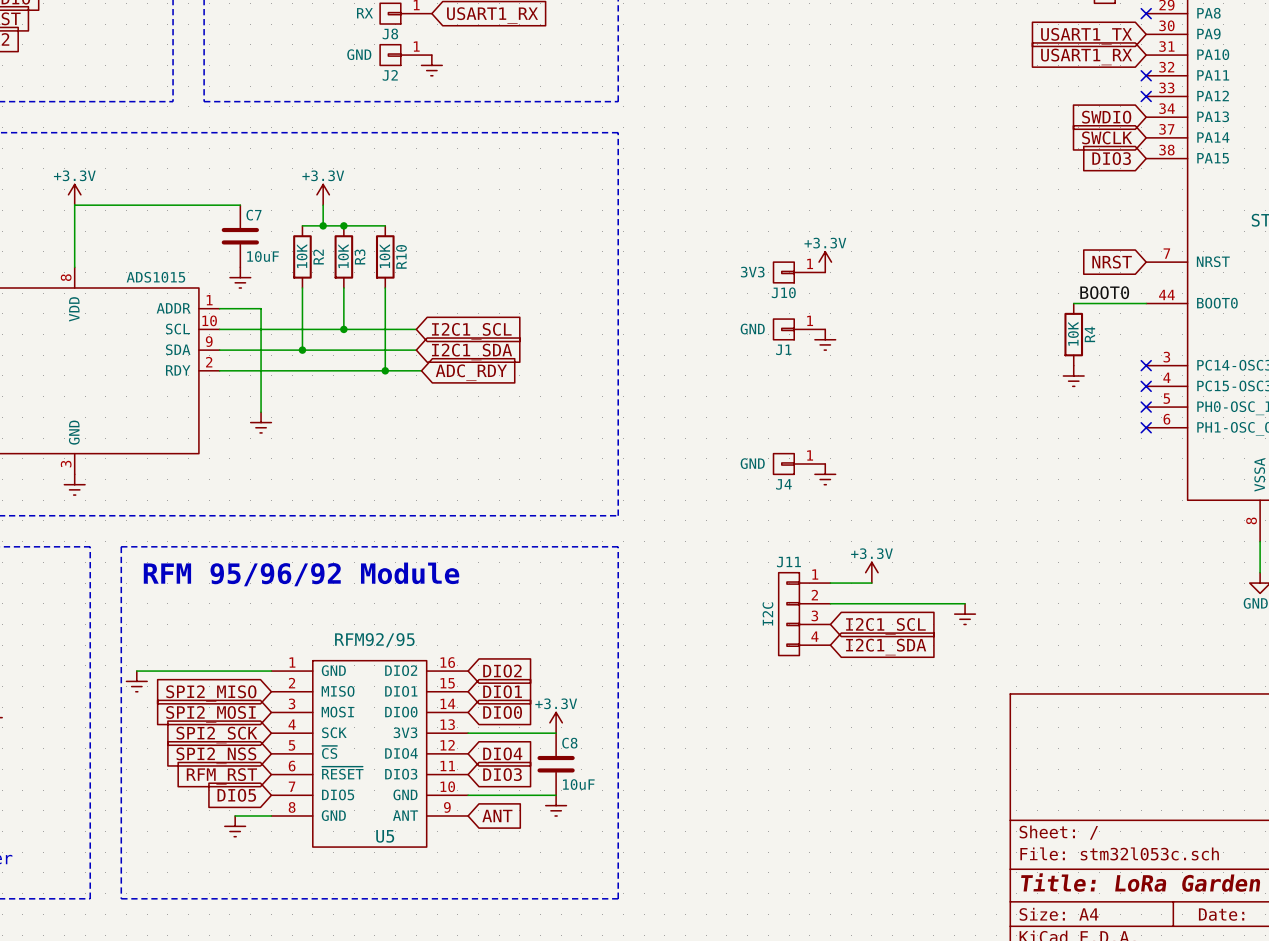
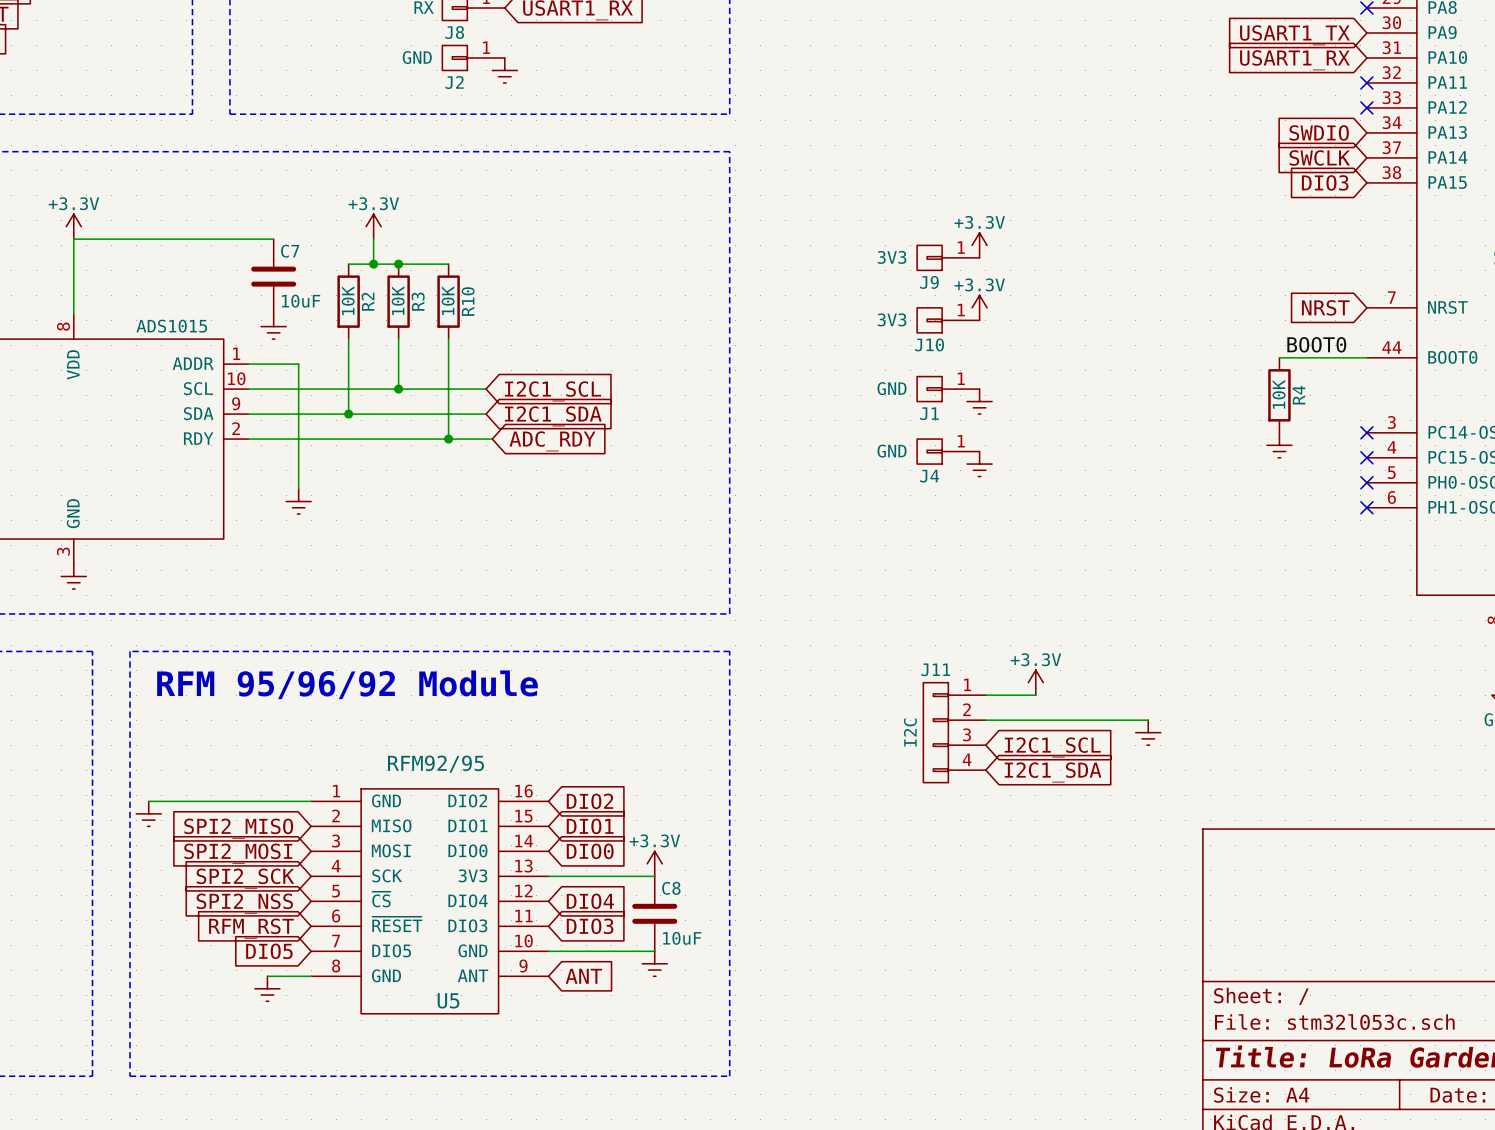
power symbol: none -> +3.3V (979, 245)
J9: none -> 3V3 (948, 257)
J4 position: (799, 463) -> (948, 451)
power symbol position: (825, 474) -> (979, 464)

